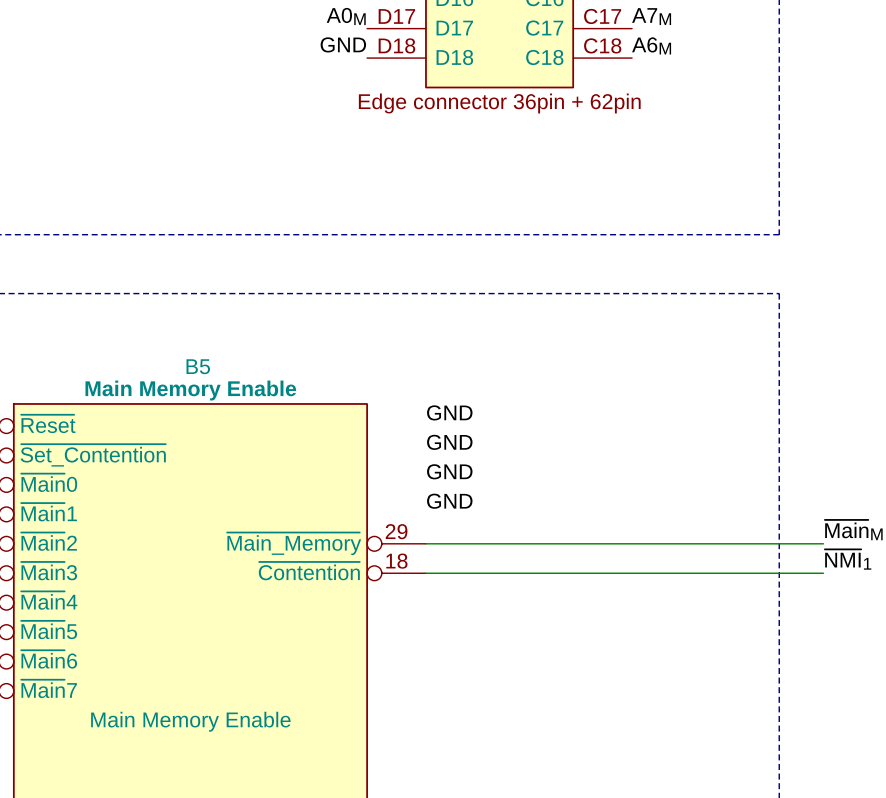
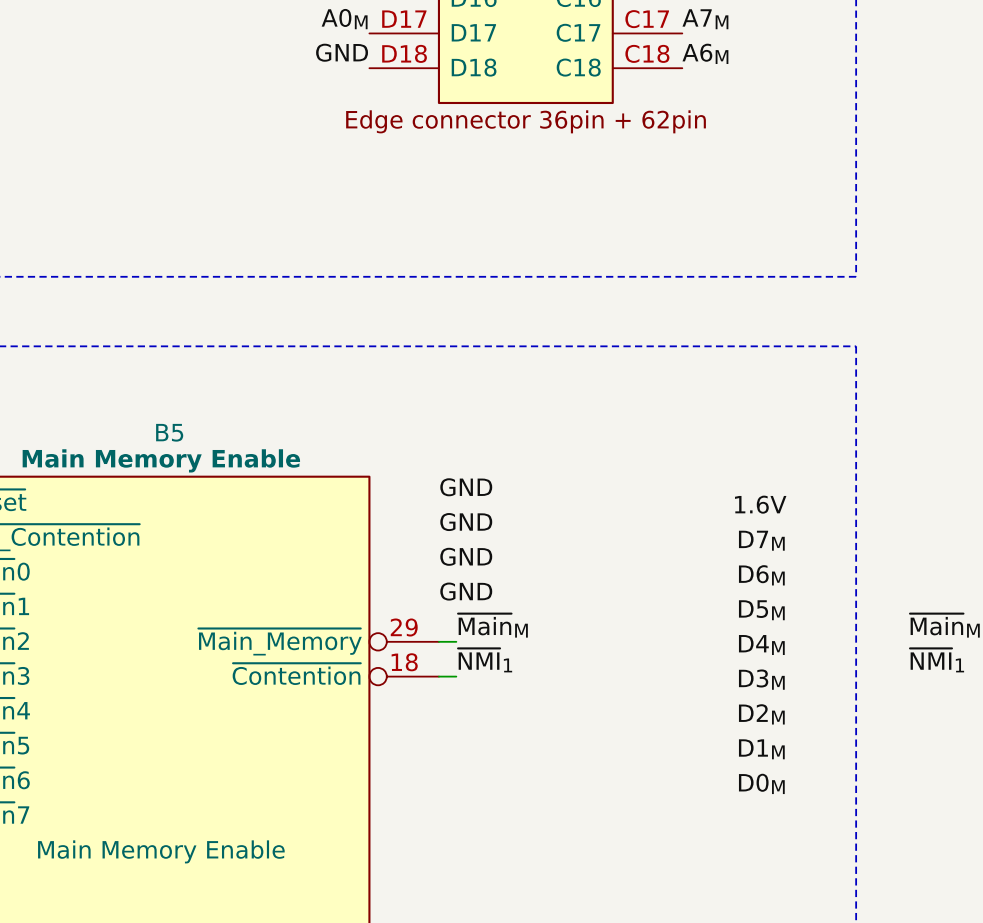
label: none -> 1.6V (760, 504)
label: none -> D7M (761, 540)
label: none -> D6M (761, 575)
label: none -> D5M (761, 610)
label: none -> ~{Main}M (492, 625)
wire: (440, 543) (823, 543) -> none
label: none -> D4M (761, 645)
label: none -> ~{NMI}1 (485, 660)
wire: (440, 573) (823, 573) -> none
label: none -> D3M (761, 679)
label: none -> D2M (761, 714)
label: none -> D1M (761, 749)
label: none -> D0M (761, 783)

